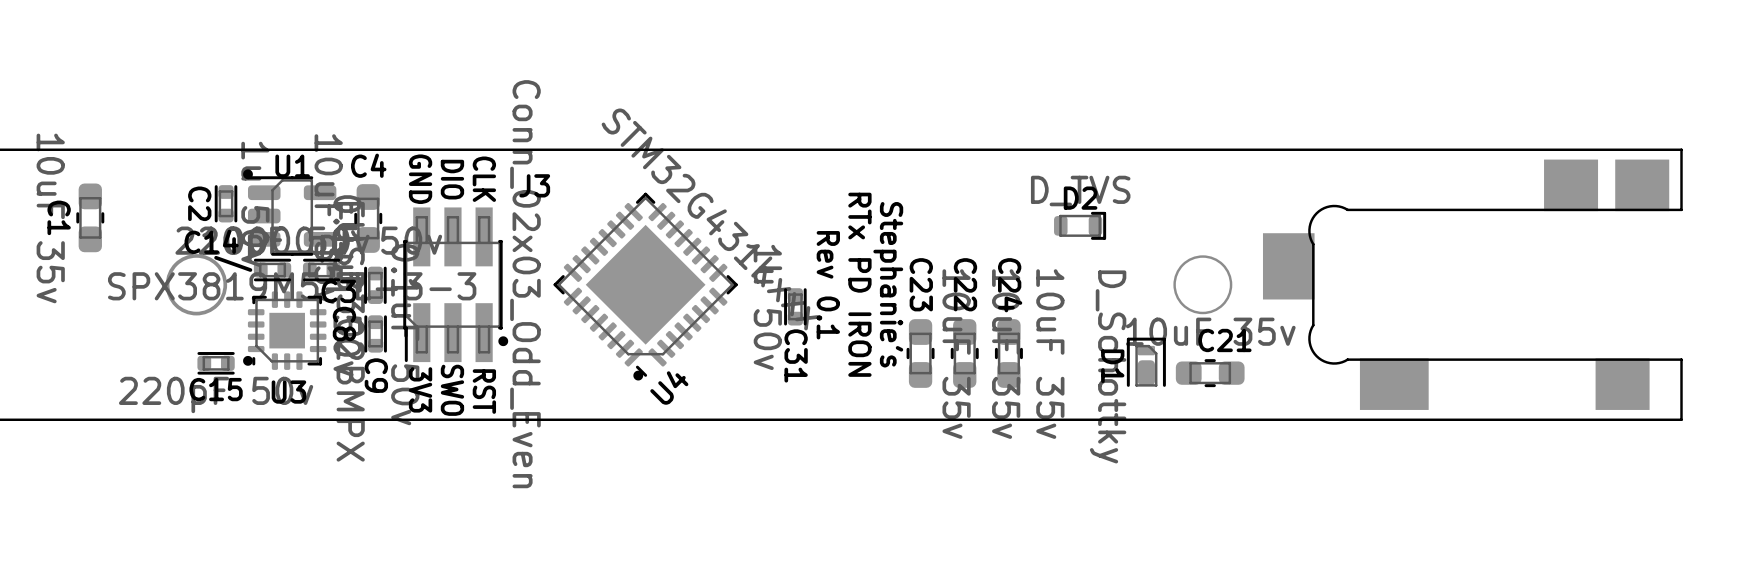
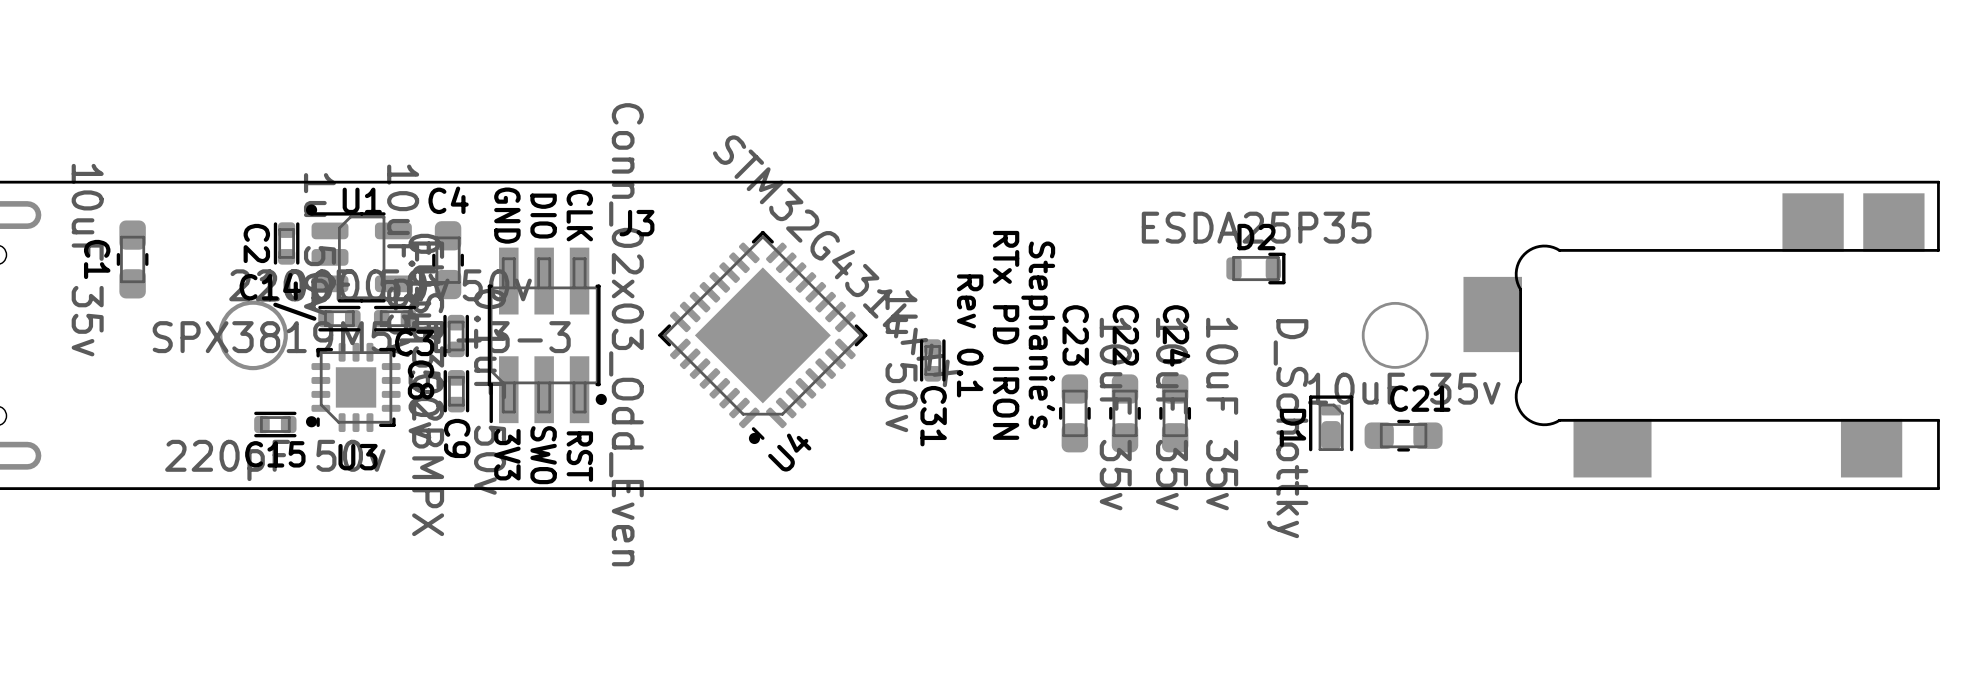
D2 value: D_TVS (1080, 191) -> ESDA25P35 (1256, 227)

